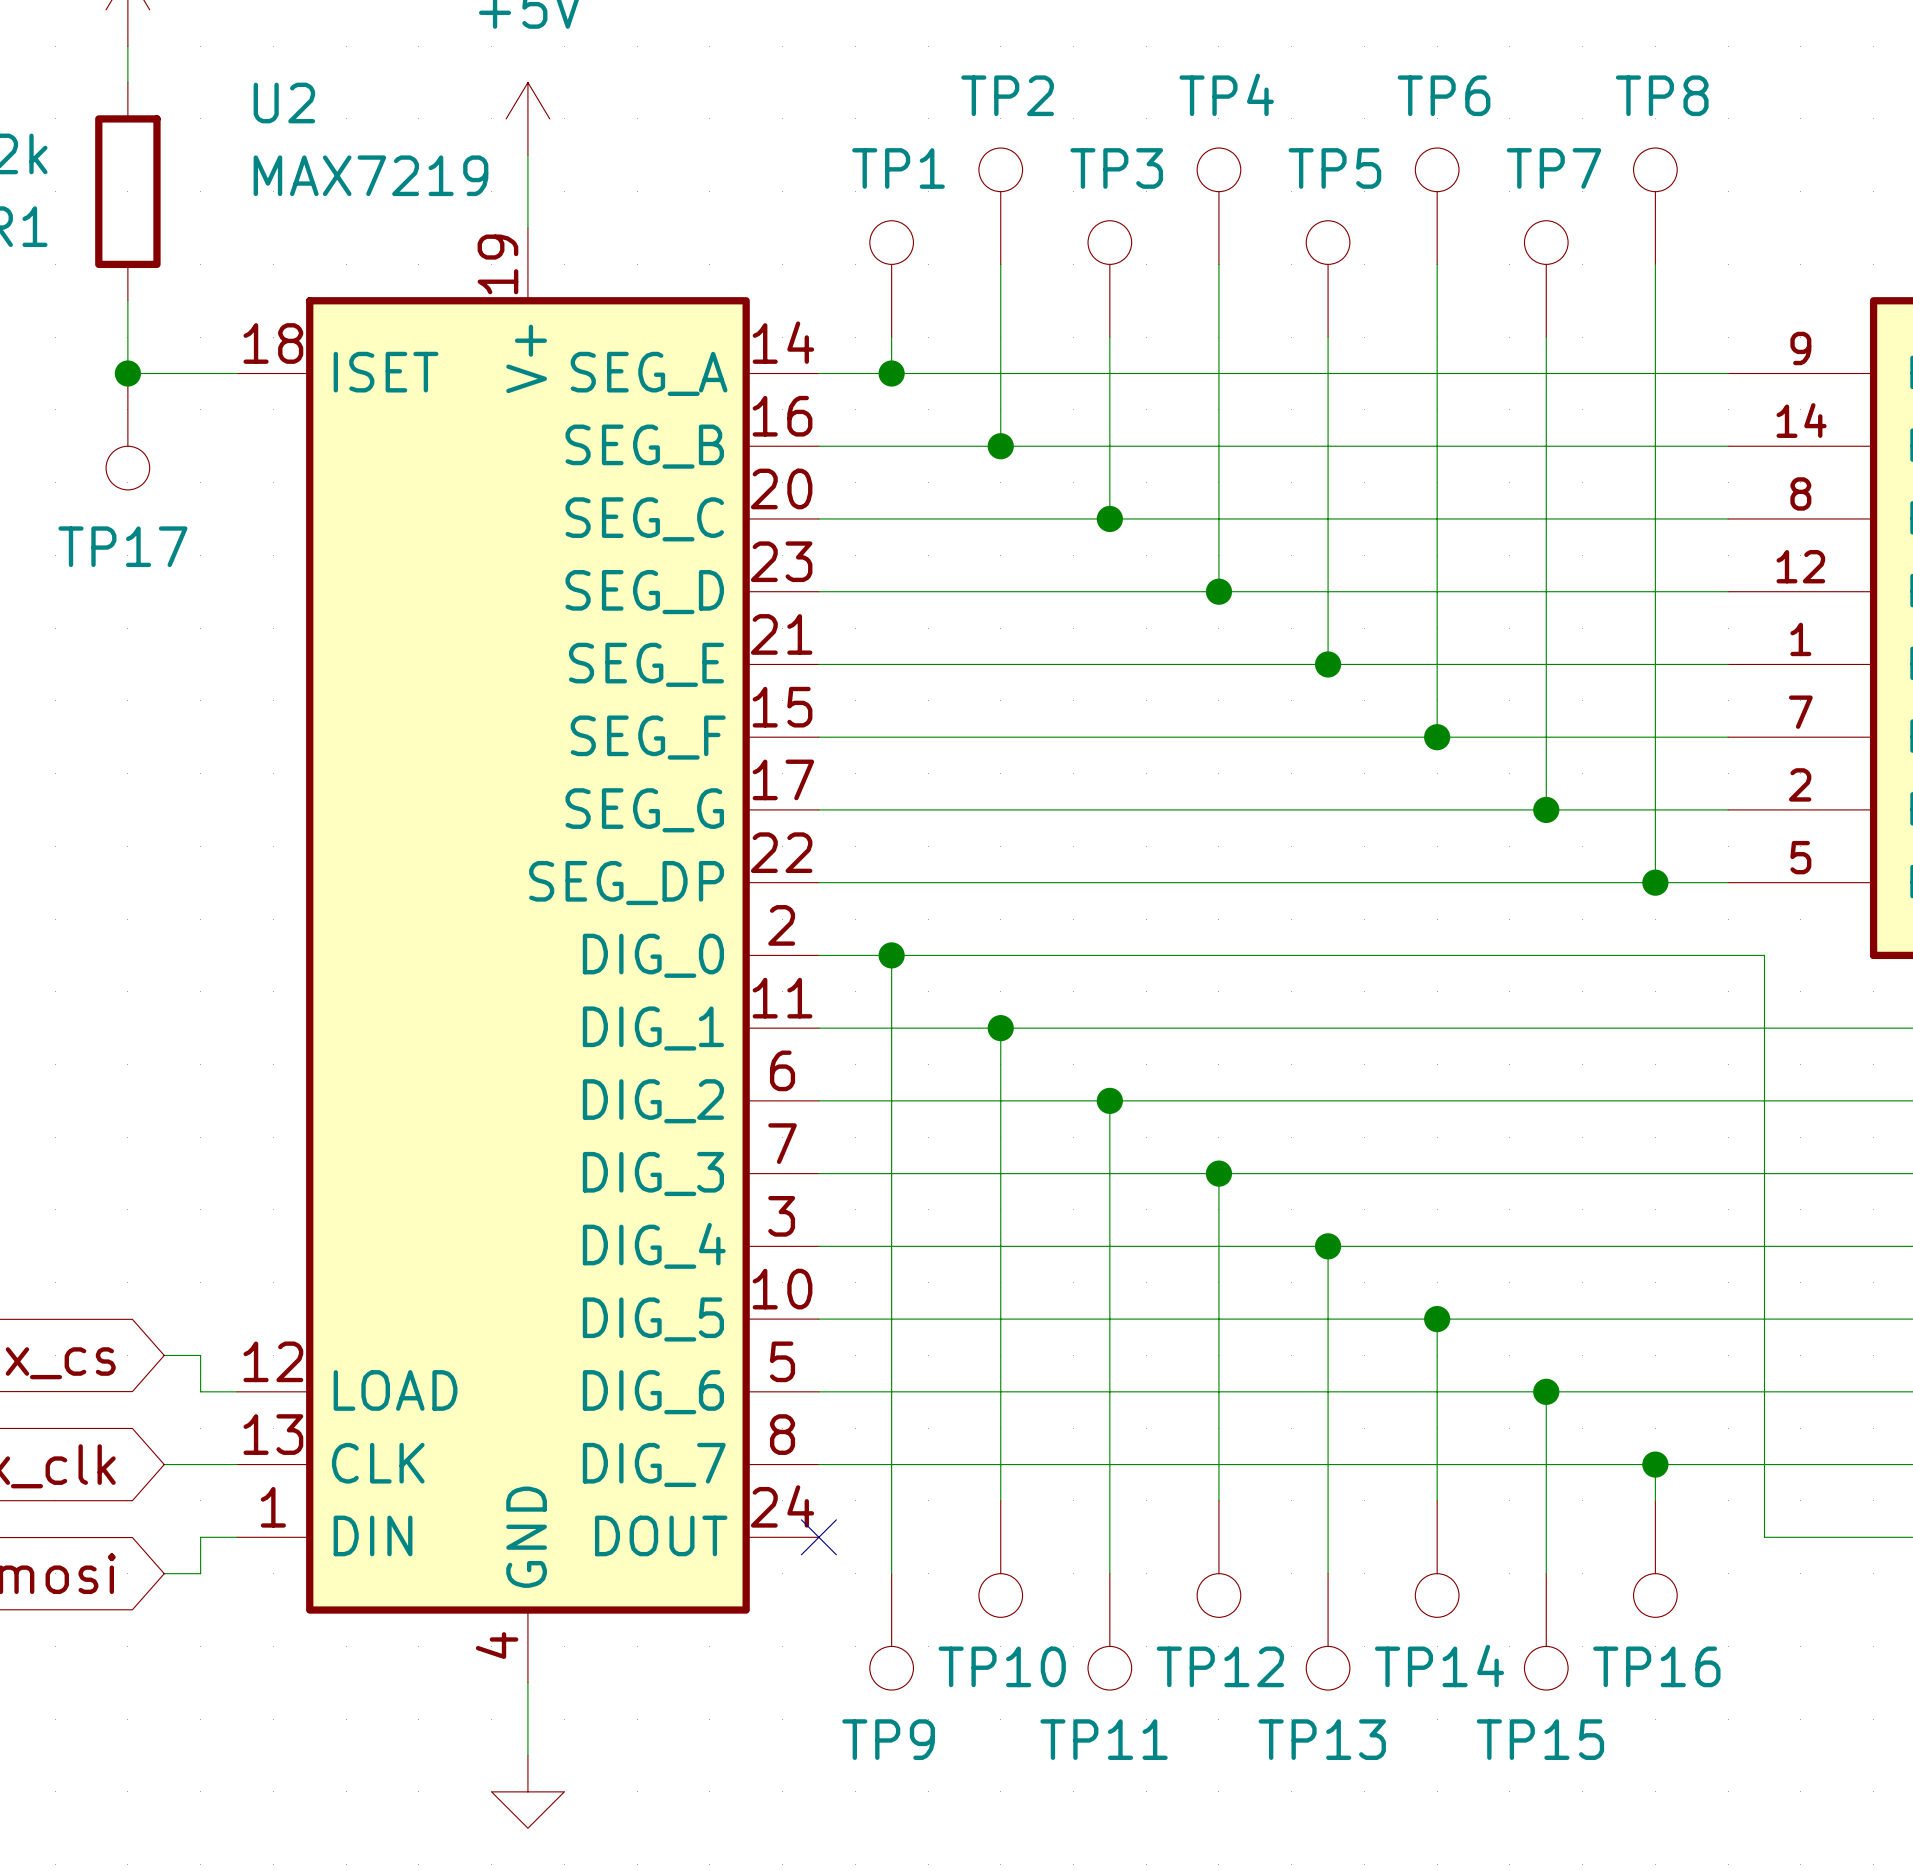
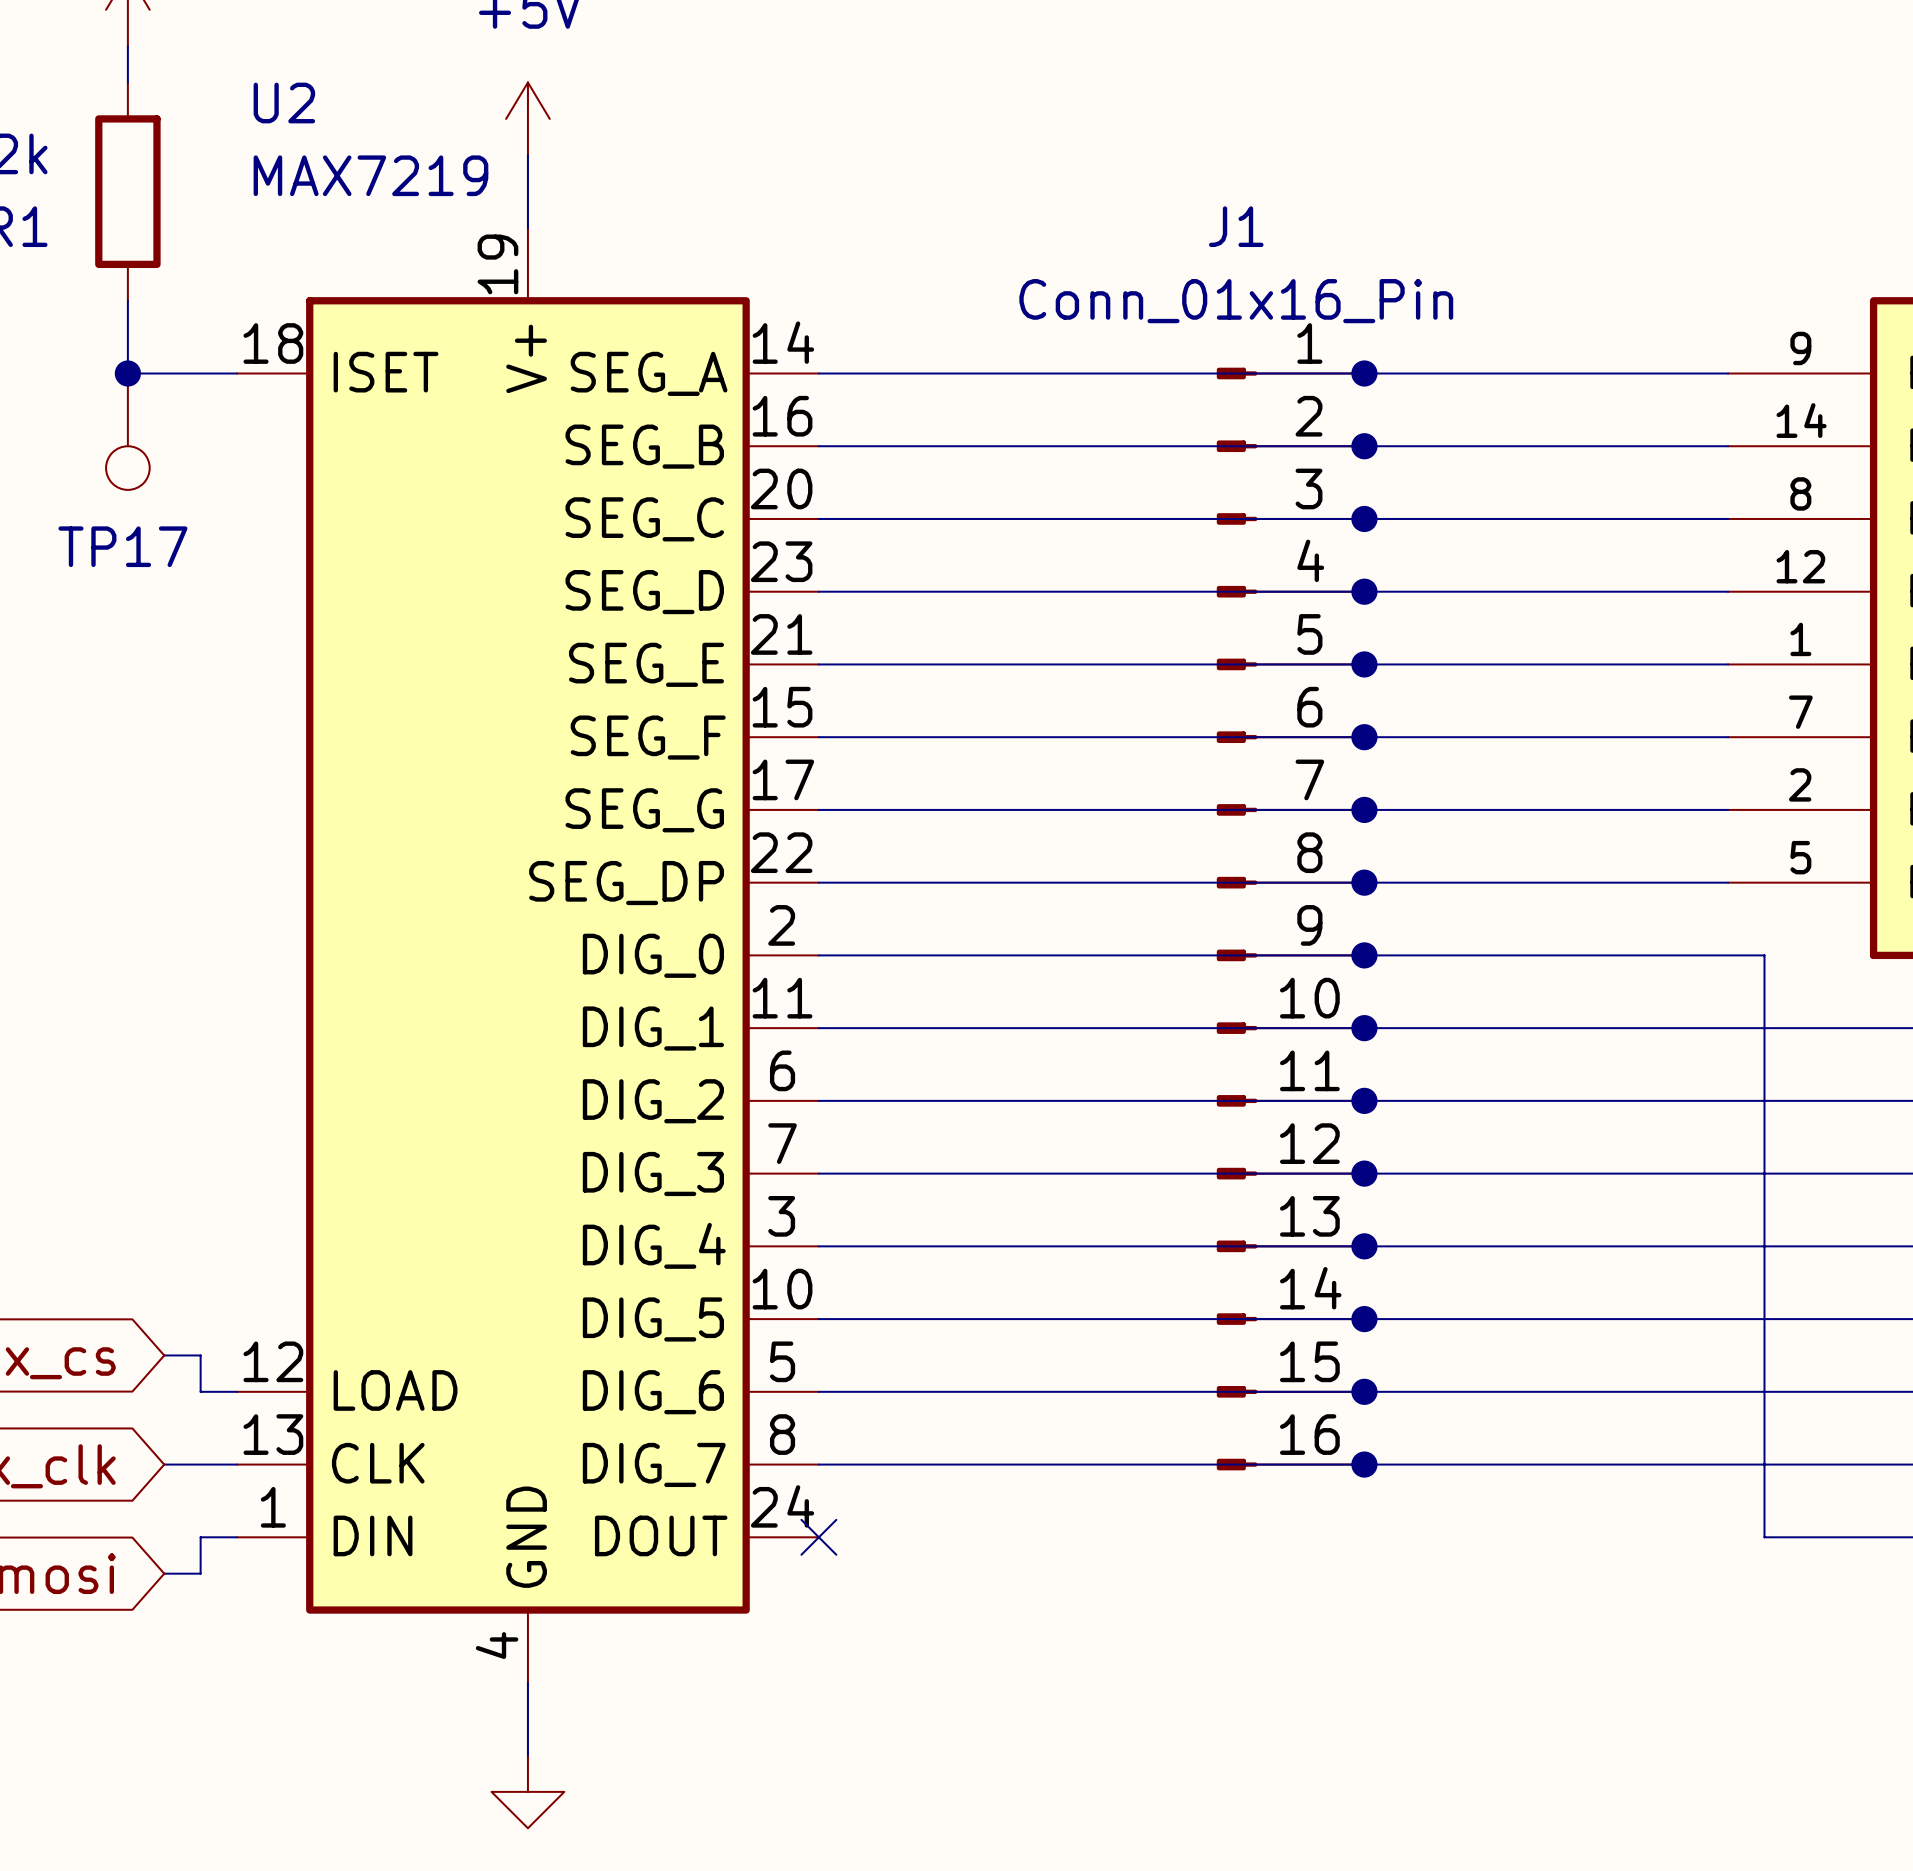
TP2: (1000, 206) -> none
TP4: (1218, 206) -> none
TP6: (1437, 206) -> none
TP8: (1655, 206) -> none
wire: (1000, 264) (1000, 446) -> none
wire: (1218, 264) (1218, 591) -> none
wire: (1437, 264) (1437, 737) -> none
wire: (1655, 264) (1655, 882) -> none
TP1: (891, 278) -> none
TP3: (1109, 278) -> none
TP5: (1328, 278) -> none
TP7: (1546, 278) -> none
wire: (891, 337) (891, 373) -> none
wire: (1109, 337) (1109, 518) -> none
wire: (1328, 337) (1328, 664) -> none
wire: (1546, 337) (1546, 809) -> none
junction: (891, 373) -> none
junction: none -> (1364, 373)
junction: (1000, 446) -> none
junction: none -> (1364, 446)
junction: (1109, 518) -> none
junction: none -> (1364, 518)
junction: (1218, 591) -> none
junction: none -> (1364, 591)
junction position: (1328, 664) -> (1364, 664)
junction: none -> (1364, 737)
junction: (1437, 737) -> none
junction: none -> (1364, 809)
junction: (1546, 809) -> none
junction: none -> (1364, 882)
junction: (1655, 882) -> none
J1: none -> Conn_01x16_Pin (1290, 919)
wire: (891, 955) (891, 1573) -> none
junction: (891, 955) -> none
junction: none -> (1364, 955)
wire: (1000, 1028) (1000, 1500) -> none
junction: (1000, 1028) -> none
junction: none -> (1364, 1028)
wire: (1109, 1100) (1109, 1573) -> none
junction: (1109, 1100) -> none
junction: none -> (1364, 1100)
wire: (1218, 1173) (1218, 1500) -> none
junction: (1218, 1173) -> none
junction: none -> (1364, 1173)
wire: (1328, 1246) (1328, 1573) -> none
junction position: (1328, 1246) -> (1364, 1246)
junction: none -> (1364, 1319)
wire: (1437, 1319) (1437, 1500) -> none
junction: (1437, 1319) -> none
junction: none -> (1364, 1391)
wire: (1546, 1391) (1546, 1573) -> none
junction: (1546, 1391) -> none
junction: none -> (1364, 1464)
wire: (1655, 1464) (1655, 1500) -> none
junction: (1655, 1464) -> none
TP10: (1000, 1559) -> none
TP12: (1218, 1559) -> none
TP14: (1437, 1559) -> none
TP16: (1655, 1559) -> none
TP9: (891, 1631) -> none
TP11: (1109, 1631) -> none
TP13: (1328, 1631) -> none
TP15: (1546, 1631) -> none

